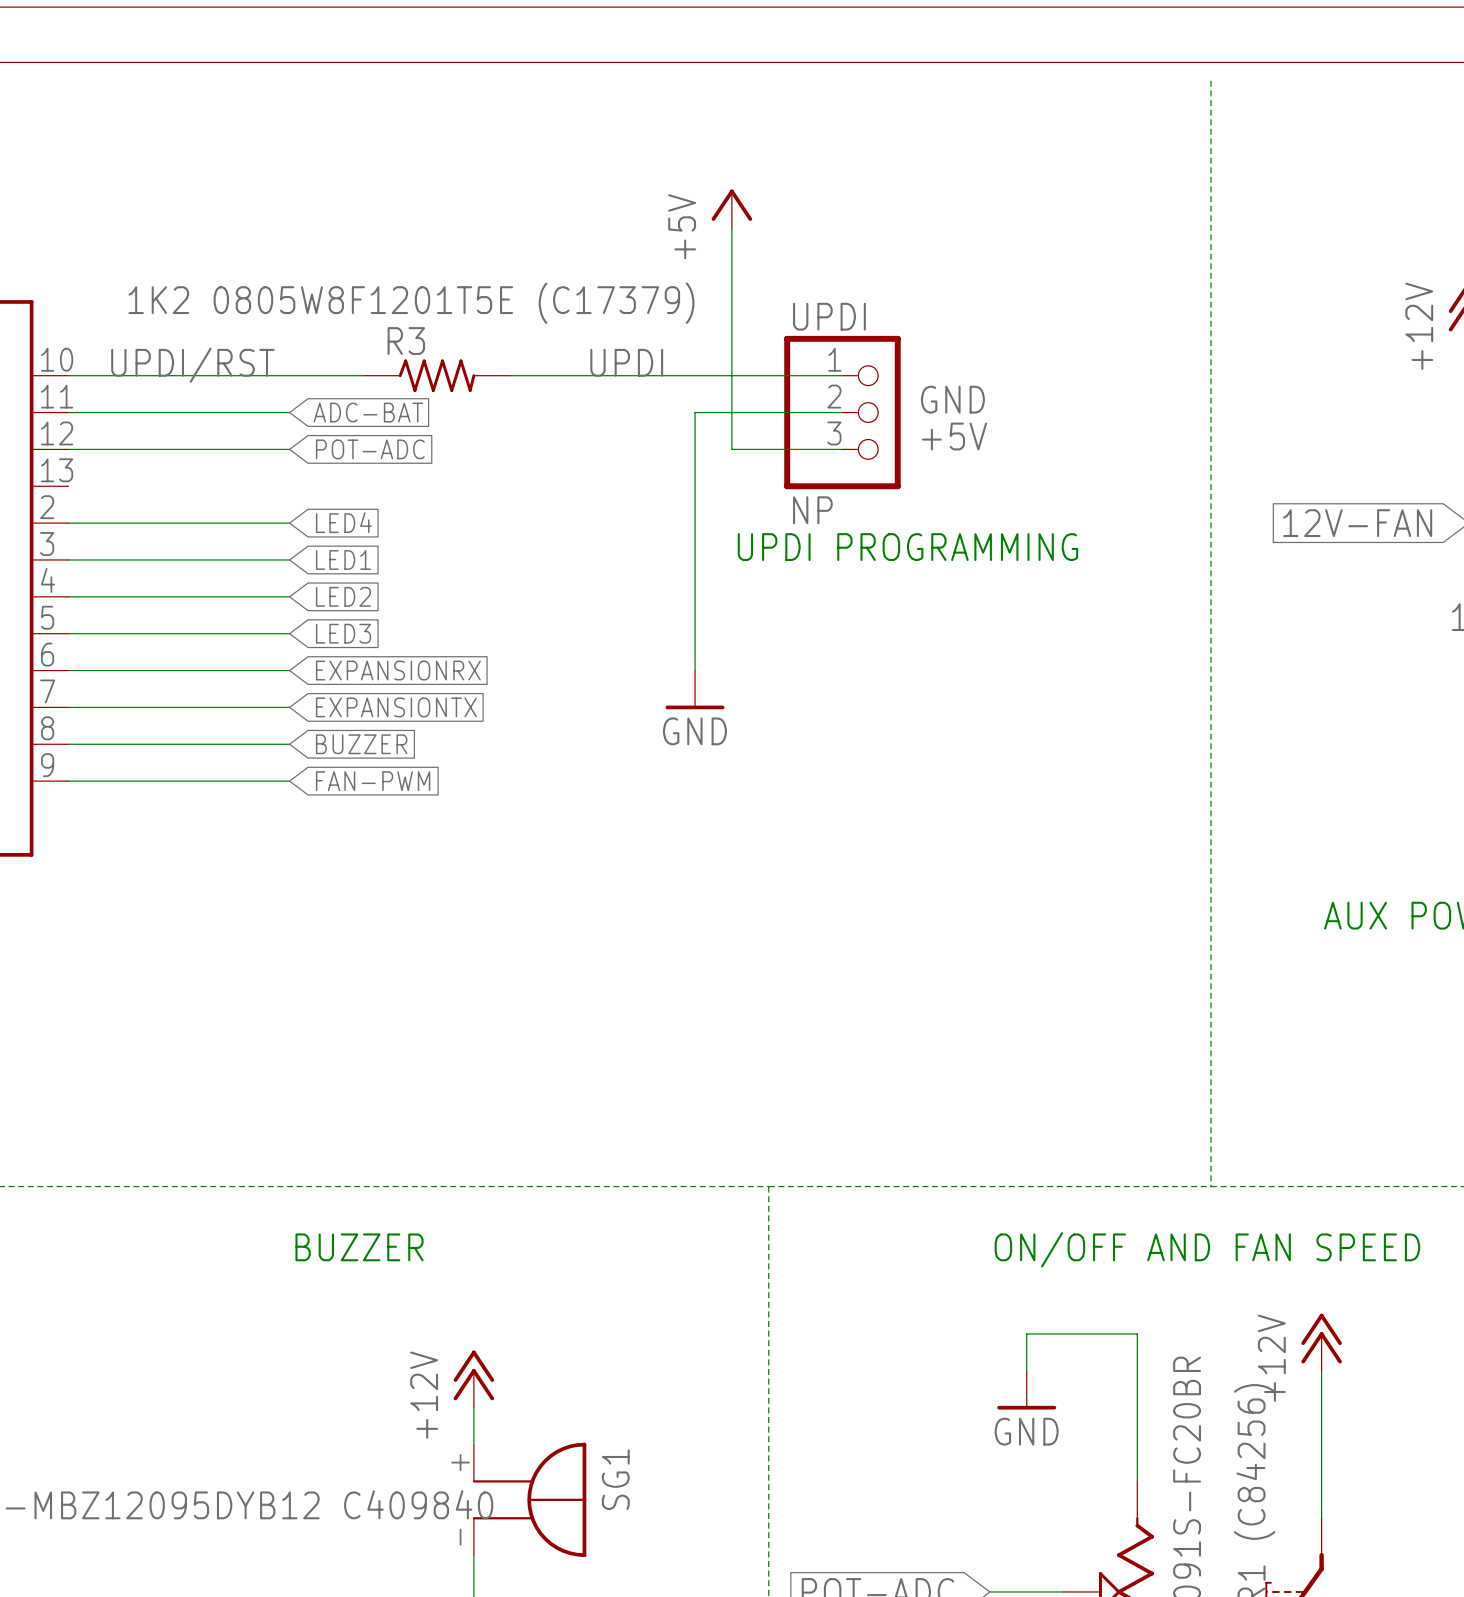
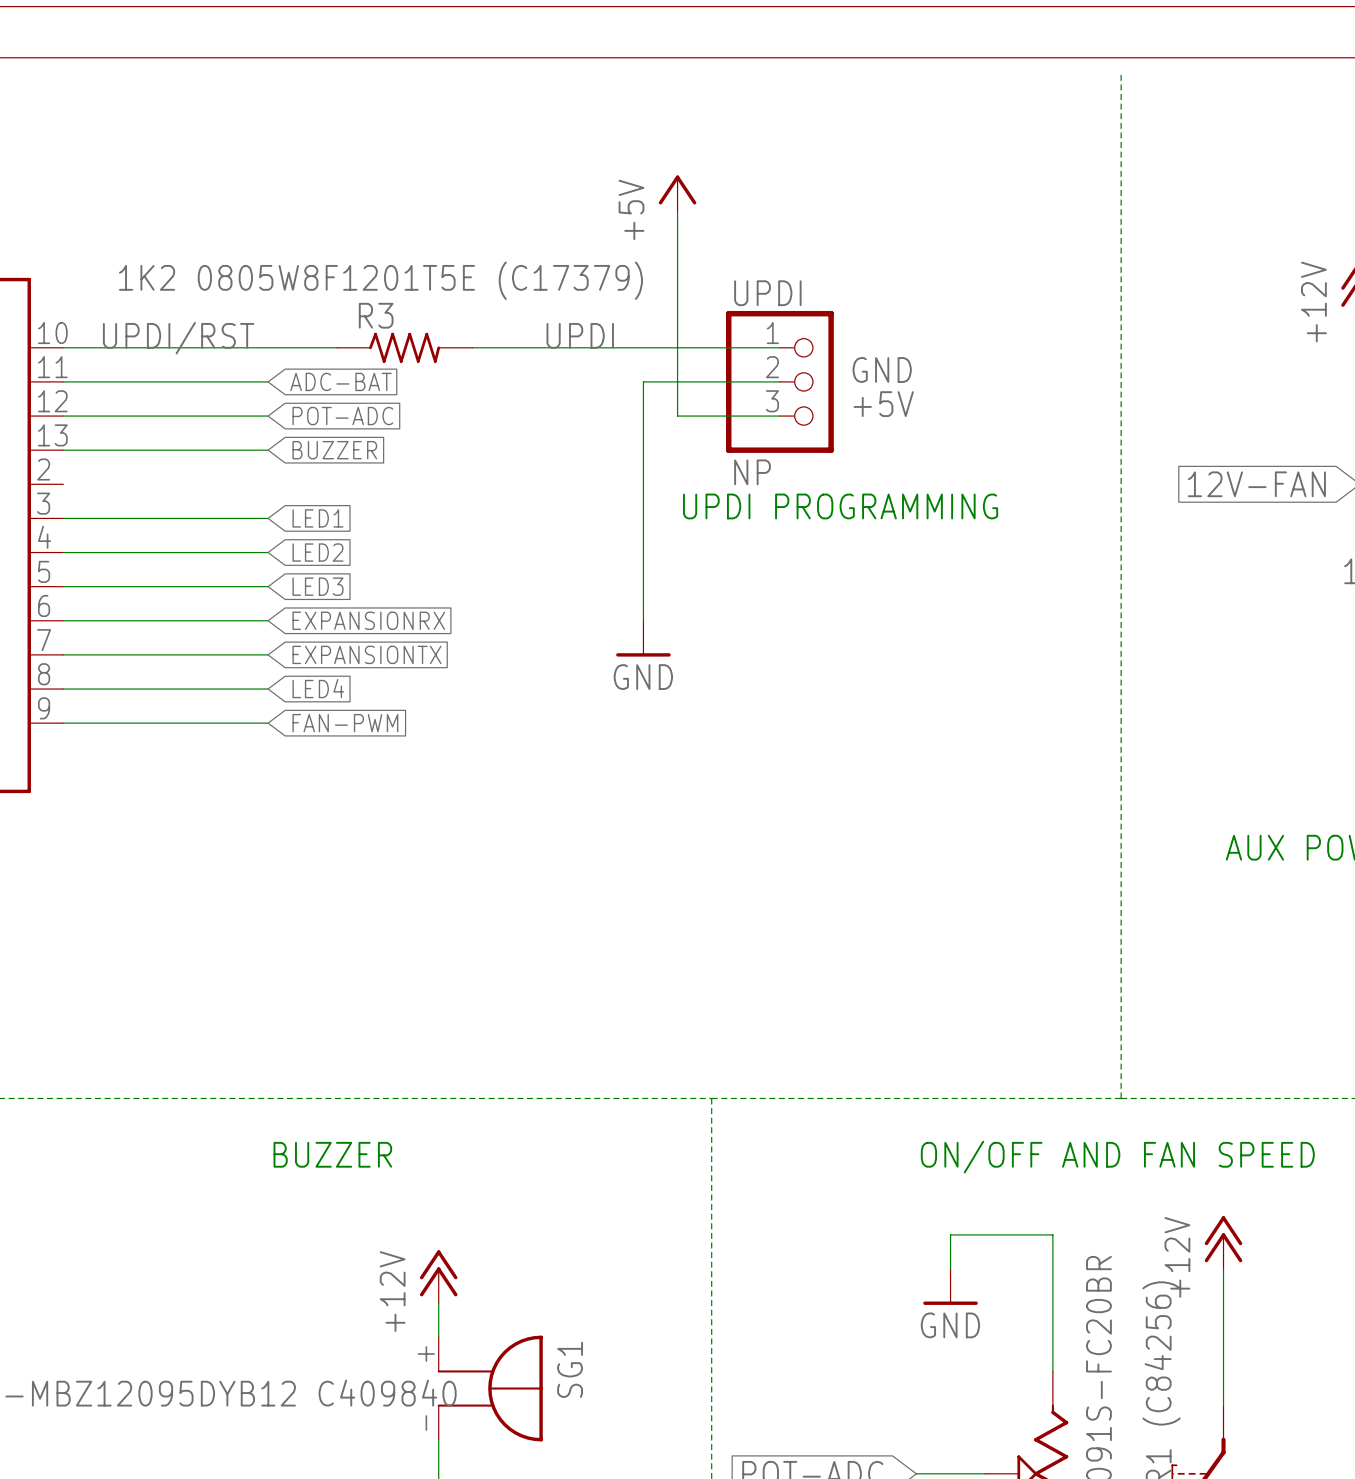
global label: none -> BUZZER (334, 450)
global label: LED4 (343, 522) -> none
wire: (68, 523) (289, 523) -> (63, 450) (268, 450)
global label: BUZZER (361, 744) -> LED4 (318, 688)

